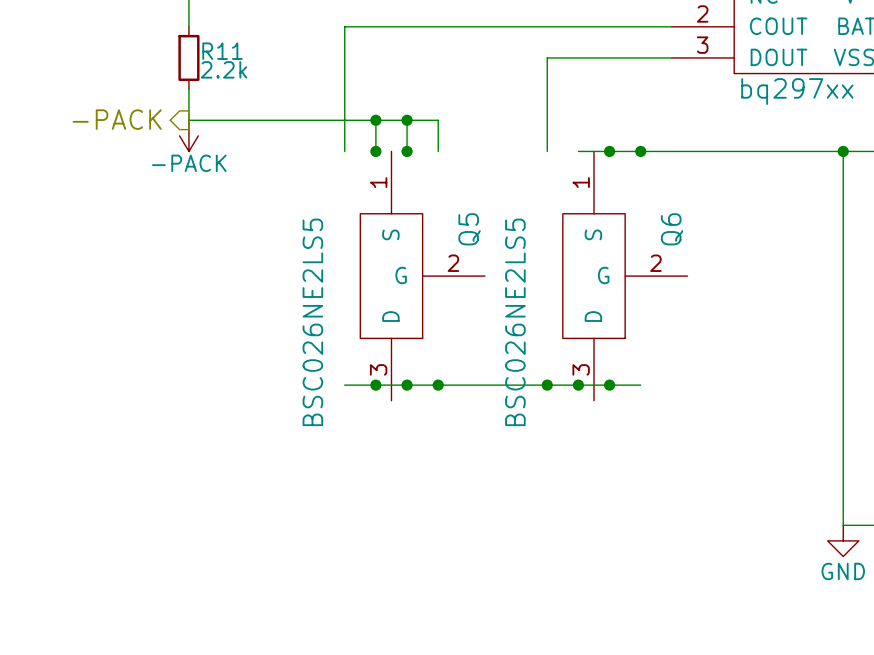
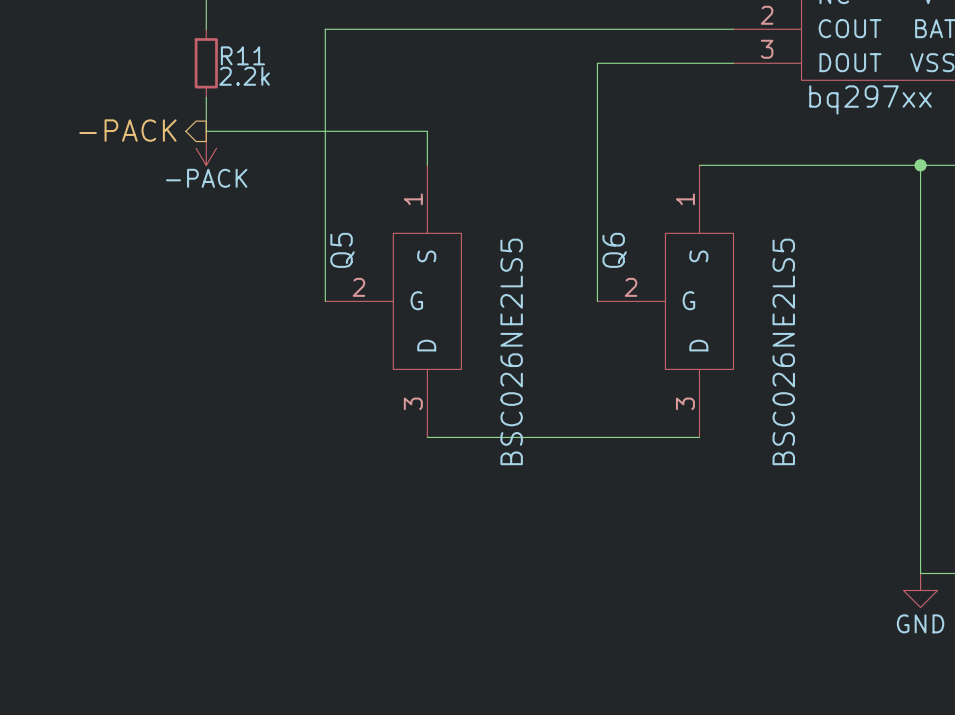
wire: (344, 26) (344, 151) -> (376, 29) (325, 29) (325, 301)
wire: (375, 120) (375, 151) -> none
junction: (375, 120) -> none
wire: (391, 120) (438, 120) (438, 151) -> (427, 131) (427, 165)
wire: (407, 120) (407, 151) -> none
junction: (407, 120) -> none
junction: (375, 151) -> none
junction: (407, 151) -> none
wire: none -> (597, 165) (597, 301)
wire: (578, 151) (640, 151) -> none
junction: (609, 151) -> none
junction: (640, 151) -> none
Q5 flip: as is (391, 276) -> left-right (427, 301)
Q6 flip: as is (593, 276) -> left-right (699, 301)
wire: (344, 385) (640, 385) -> none
junction: (375, 385) -> none
junction: (407, 385) -> none
junction: (438, 385) -> none
junction: (547, 385) -> none
junction: (578, 385) -> none
junction: (609, 385) -> none
wire: none -> (427, 437) (699, 437)

